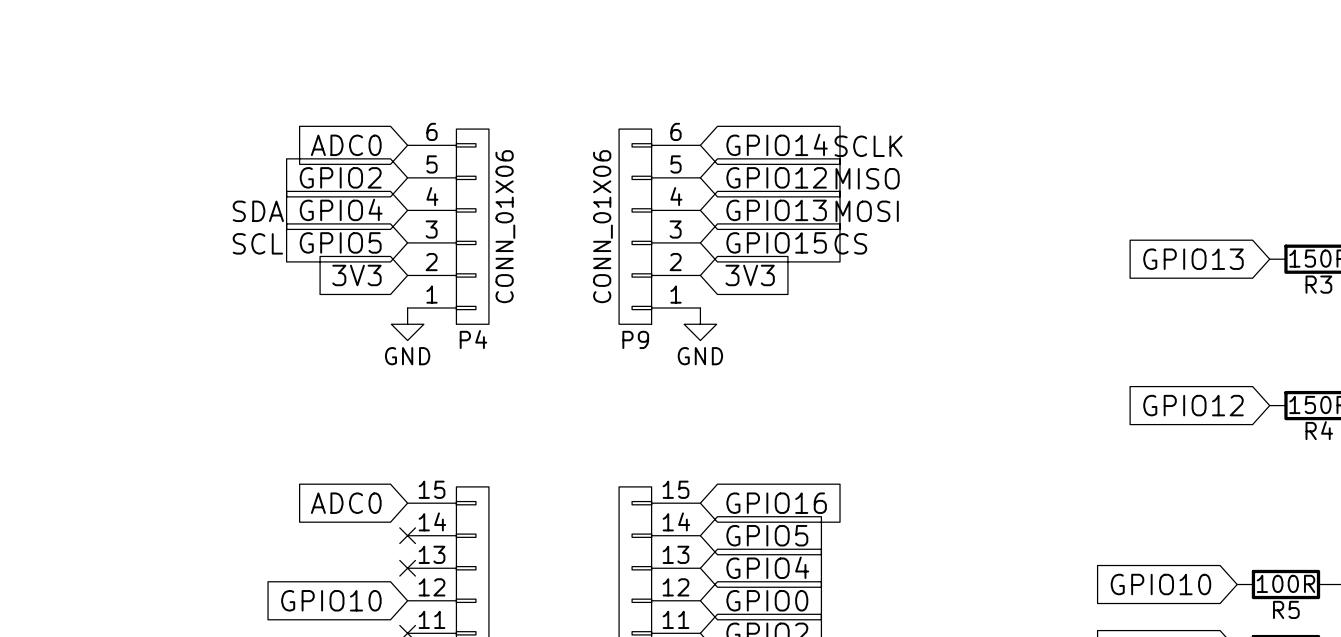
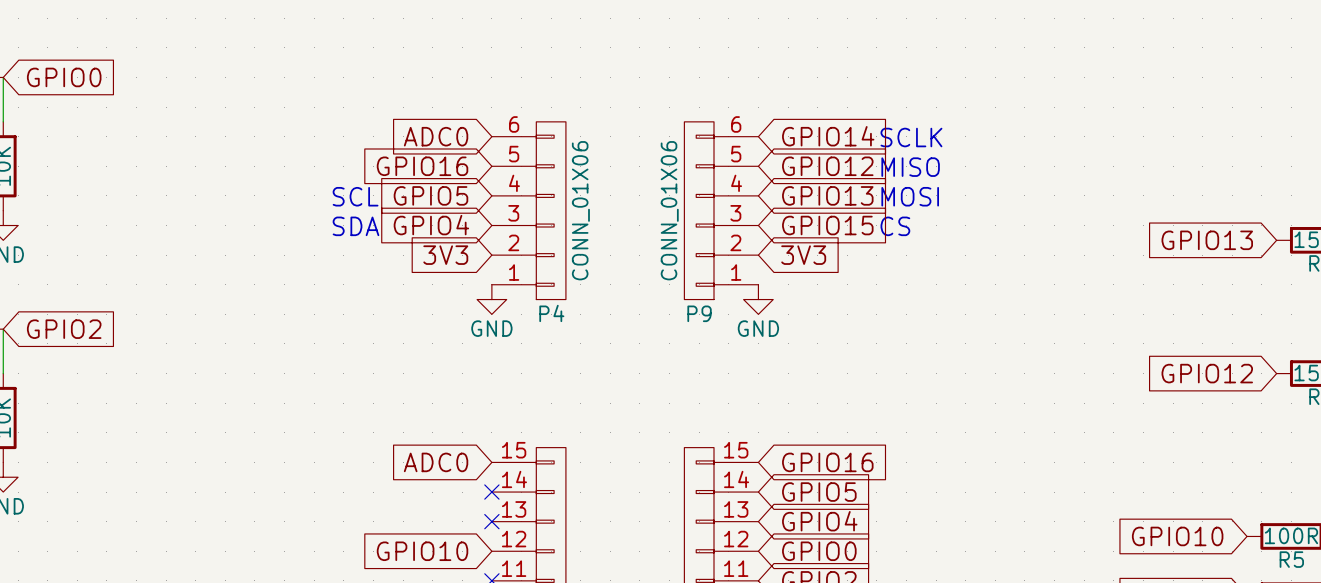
global label: GPIO2 (340, 177) -> GPIO16 (422, 166)
global label: GPIO4 (341, 209) -> GPIO5 (430, 195)
text: SDA (258, 211) -> SCL (355, 196)
global label: GPIO5 (340, 242) -> GPIO4 (431, 225)
text: SCL (257, 243) -> SDA (356, 226)

